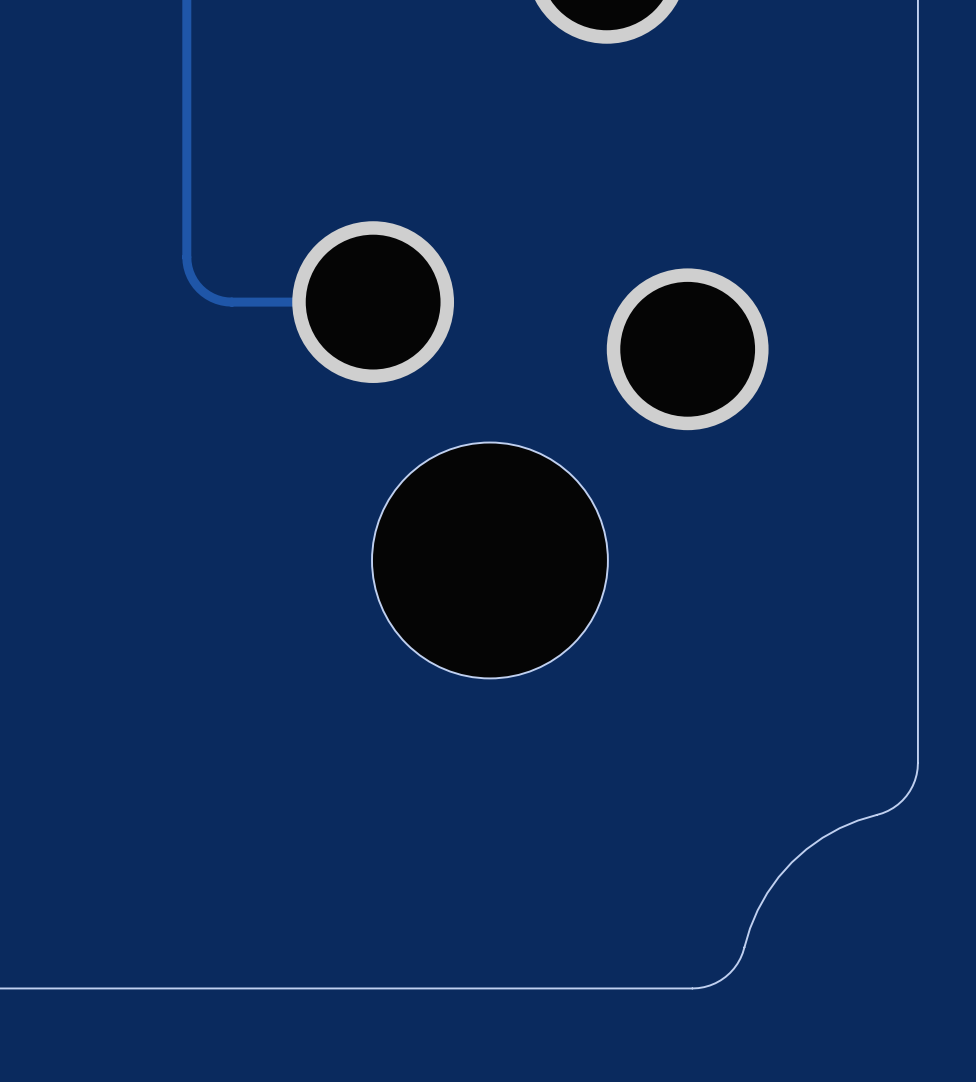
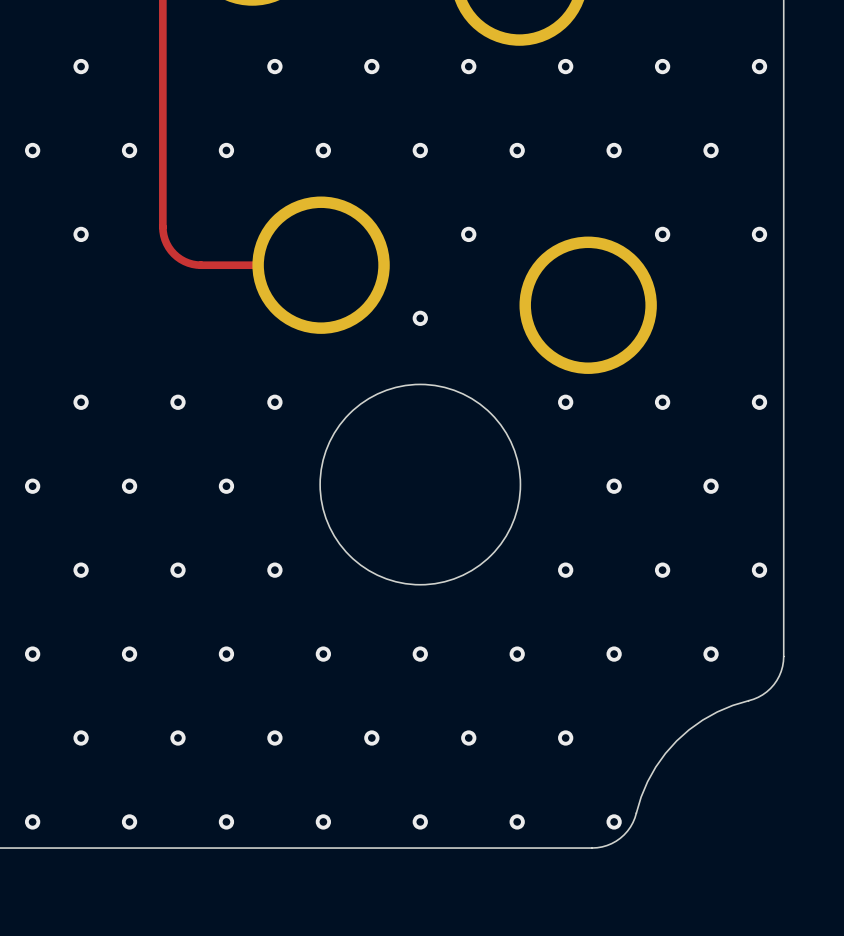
via: none -> (81, 66)
via: none -> (274, 66)
via: none -> (371, 66)
via: none -> (468, 66)
via: none -> (565, 66)
via: none -> (662, 66)
via: none -> (759, 66)
via: none -> (32, 150)
via: none -> (129, 150)
via: none -> (226, 150)
via: none -> (323, 150)
via: none -> (420, 150)
via: none -> (517, 150)
via: none -> (614, 150)
via: none -> (711, 150)
via: none -> (81, 234)
via: none -> (468, 234)
via: none -> (662, 234)
via: none -> (759, 234)
via: none -> (420, 318)
via: none -> (81, 402)
via: none -> (178, 402)
via: none -> (274, 402)
via: none -> (565, 402)
via: none -> (662, 402)
via: none -> (759, 402)
via: none -> (32, 486)
via: none -> (129, 486)
via: none -> (226, 486)
via: none -> (614, 486)
via: none -> (711, 486)
via: none -> (81, 570)
via: none -> (178, 570)
via: none -> (274, 570)
via: none -> (565, 570)
via: none -> (662, 570)
via: none -> (759, 570)
via: none -> (32, 654)
via: none -> (129, 654)
via: none -> (226, 654)
via: none -> (323, 654)
via: none -> (420, 654)
via: none -> (517, 654)
via: none -> (614, 654)
via: none -> (711, 654)
via: none -> (81, 738)
via: none -> (178, 738)
via: none -> (274, 738)
via: none -> (371, 738)
via: none -> (468, 738)
via: none -> (565, 738)
via: none -> (32, 821)
via: none -> (129, 821)
via: none -> (226, 821)
via: none -> (323, 821)
via: none -> (420, 821)
via: none -> (517, 821)
via: none -> (614, 821)

